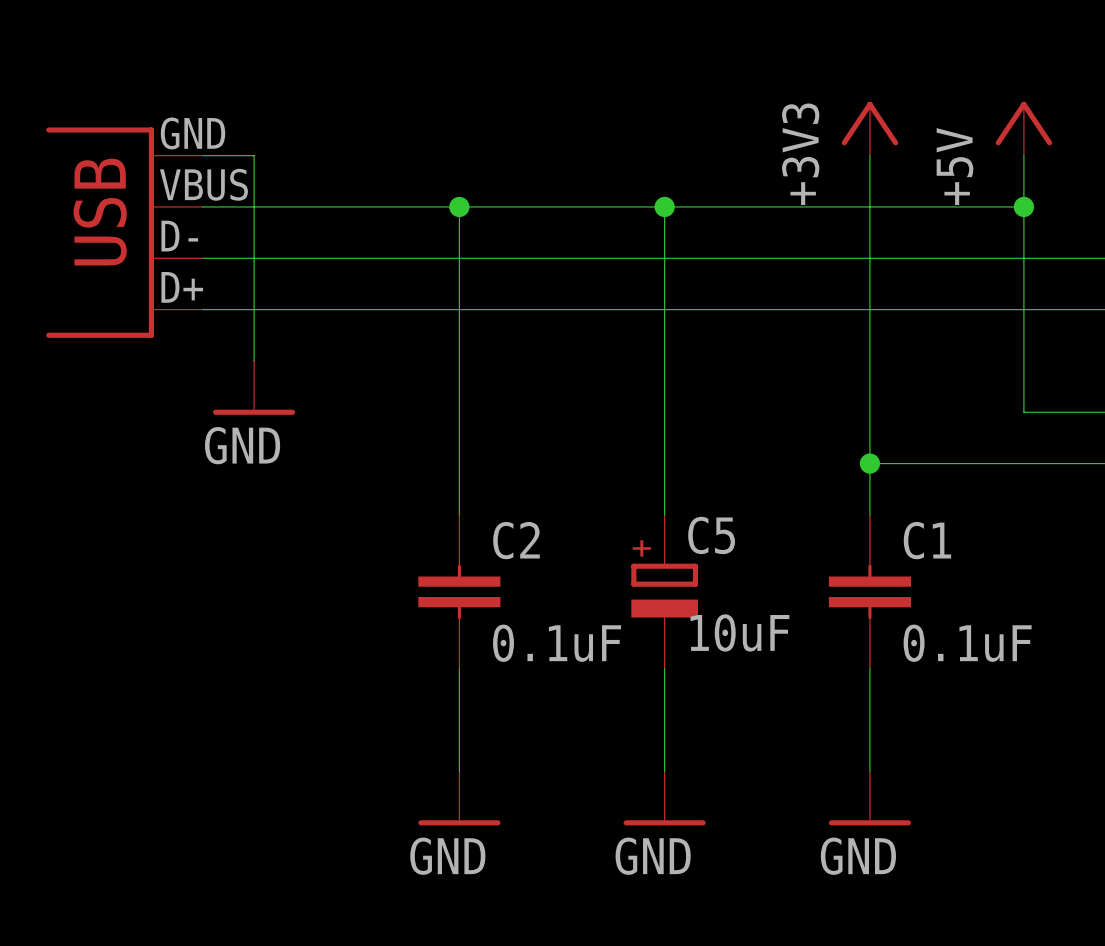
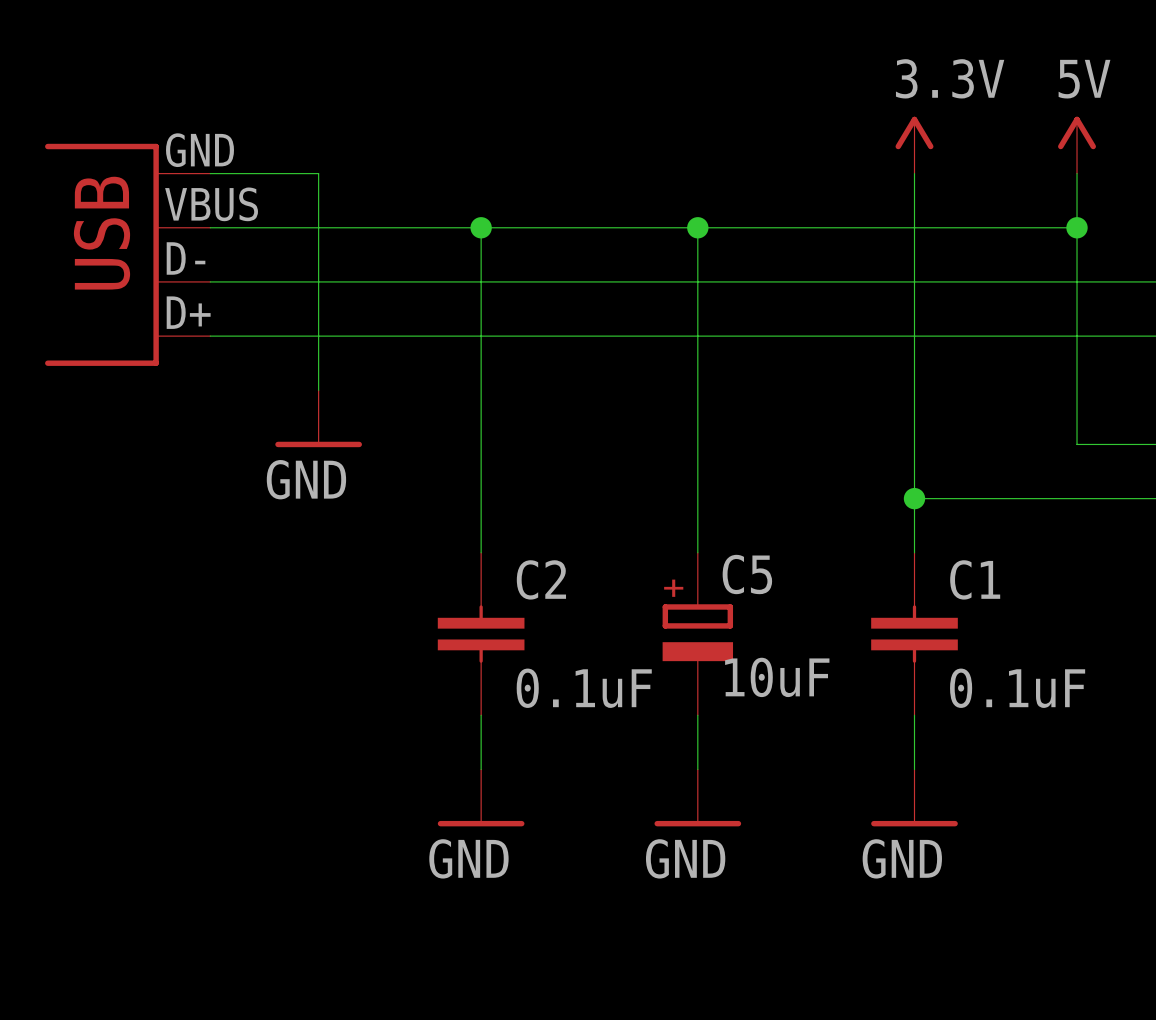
power symbol: +3V3 (869, 128) -> 3.3V (914, 145)
power symbol: +5V (1023, 128) -> 5V (1077, 145)
wire: (254, 155) (254, 360) -> (264, 173) (318, 173) (318, 390)
power symbol position: GND (254, 387) -> GND (318, 418)
power symbol position: GND (459, 798) -> GND (481, 797)
power symbol position: GND (664, 798) -> GND (697, 797)
power symbol position: GND (869, 798) -> GND (914, 797)

